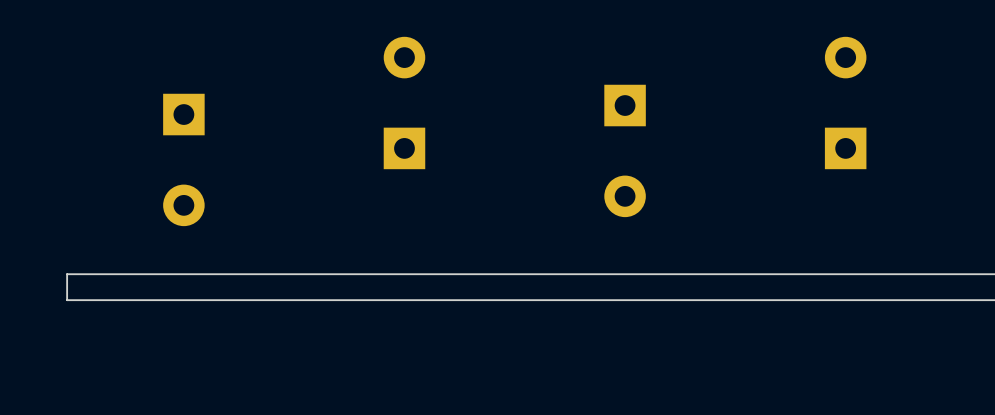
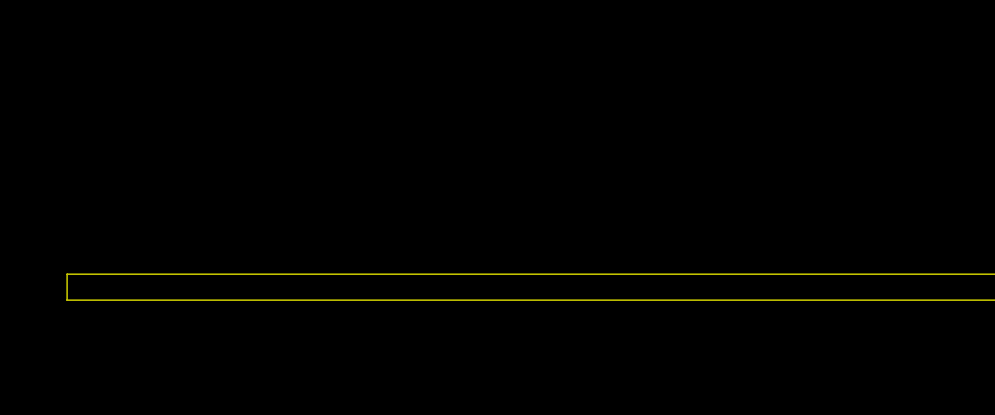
part: (404, 102) -> none
part: (845, 102) -> none
part: (625, 150) -> none
part: (183, 159) -> none

